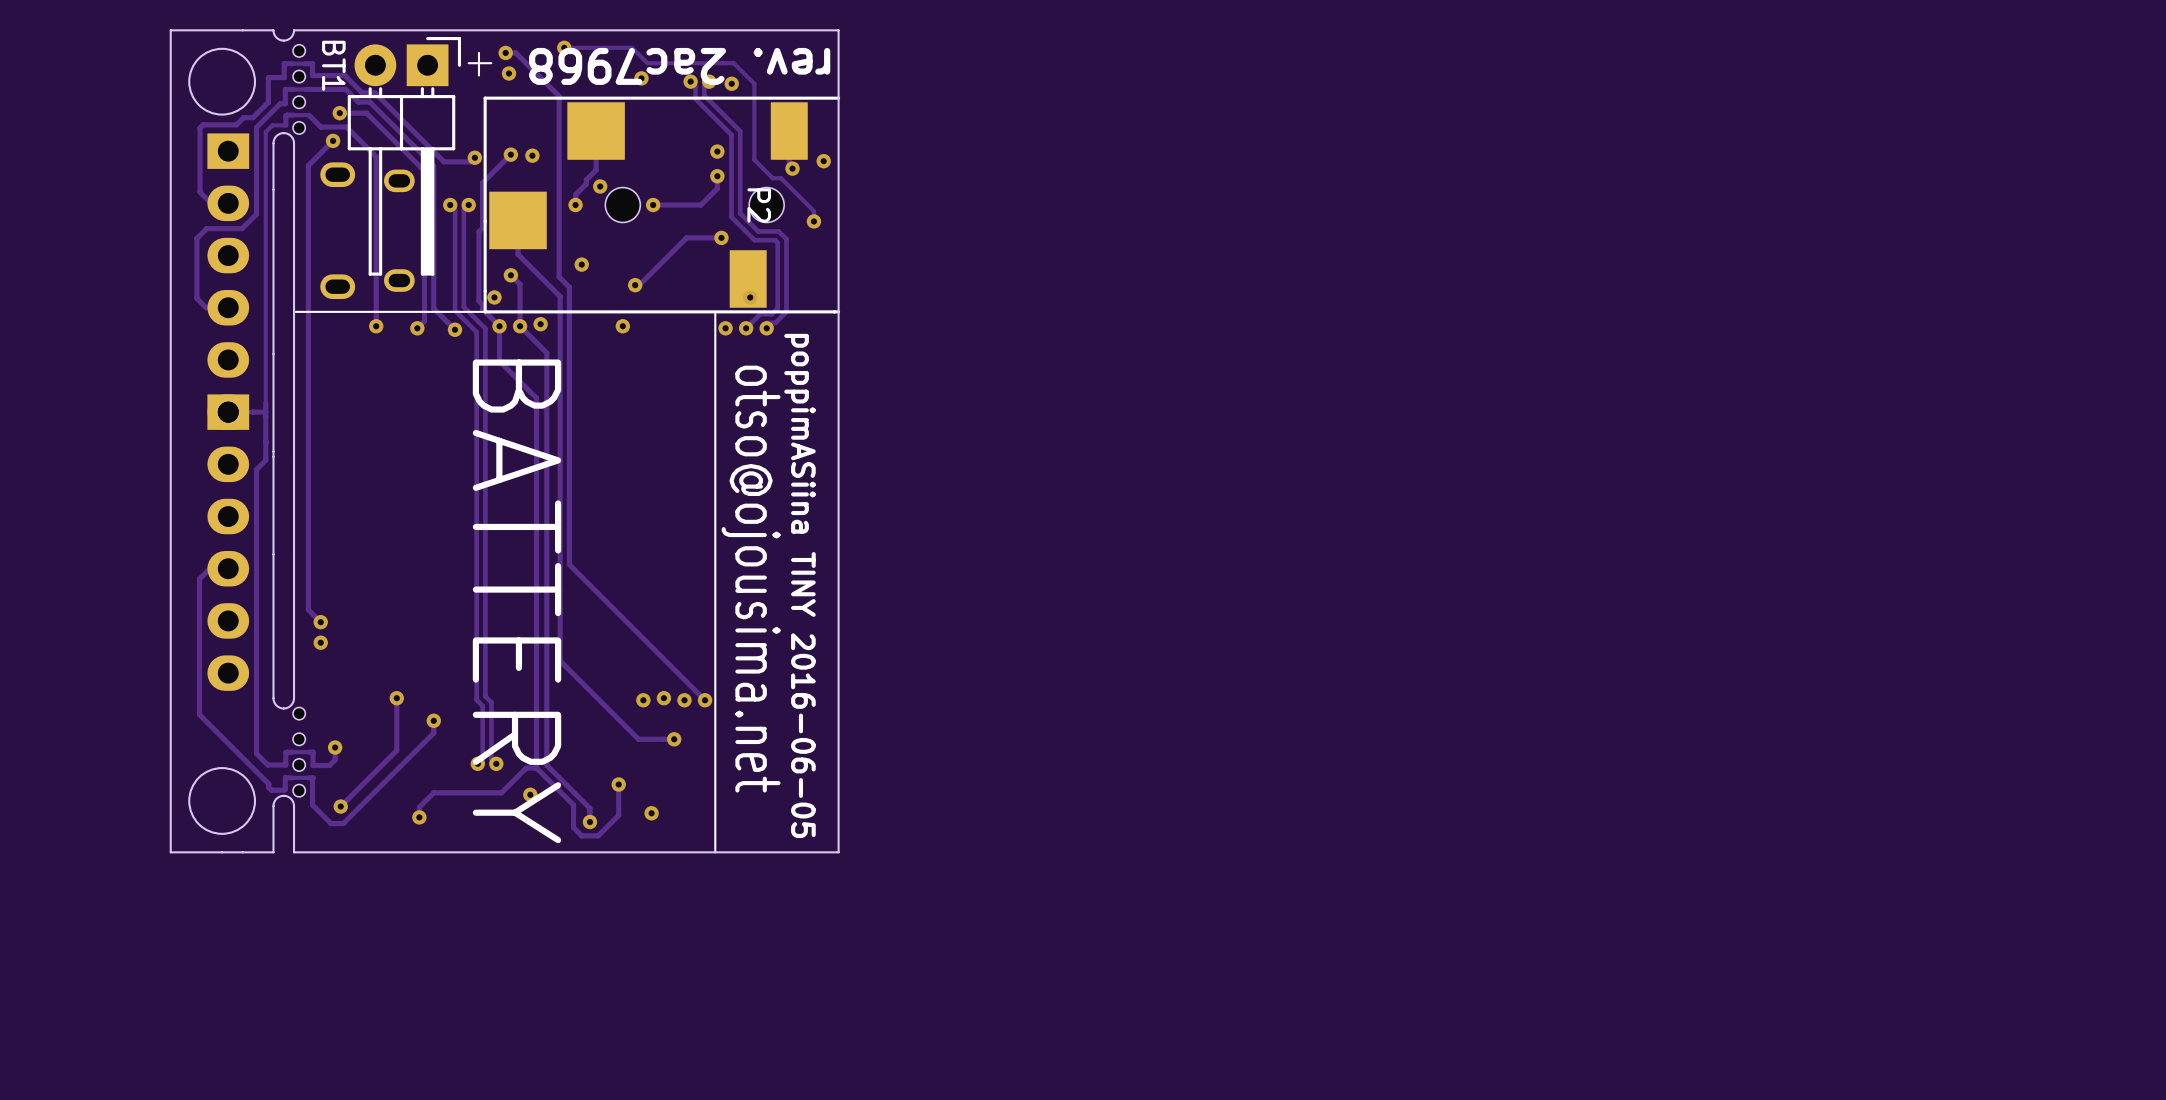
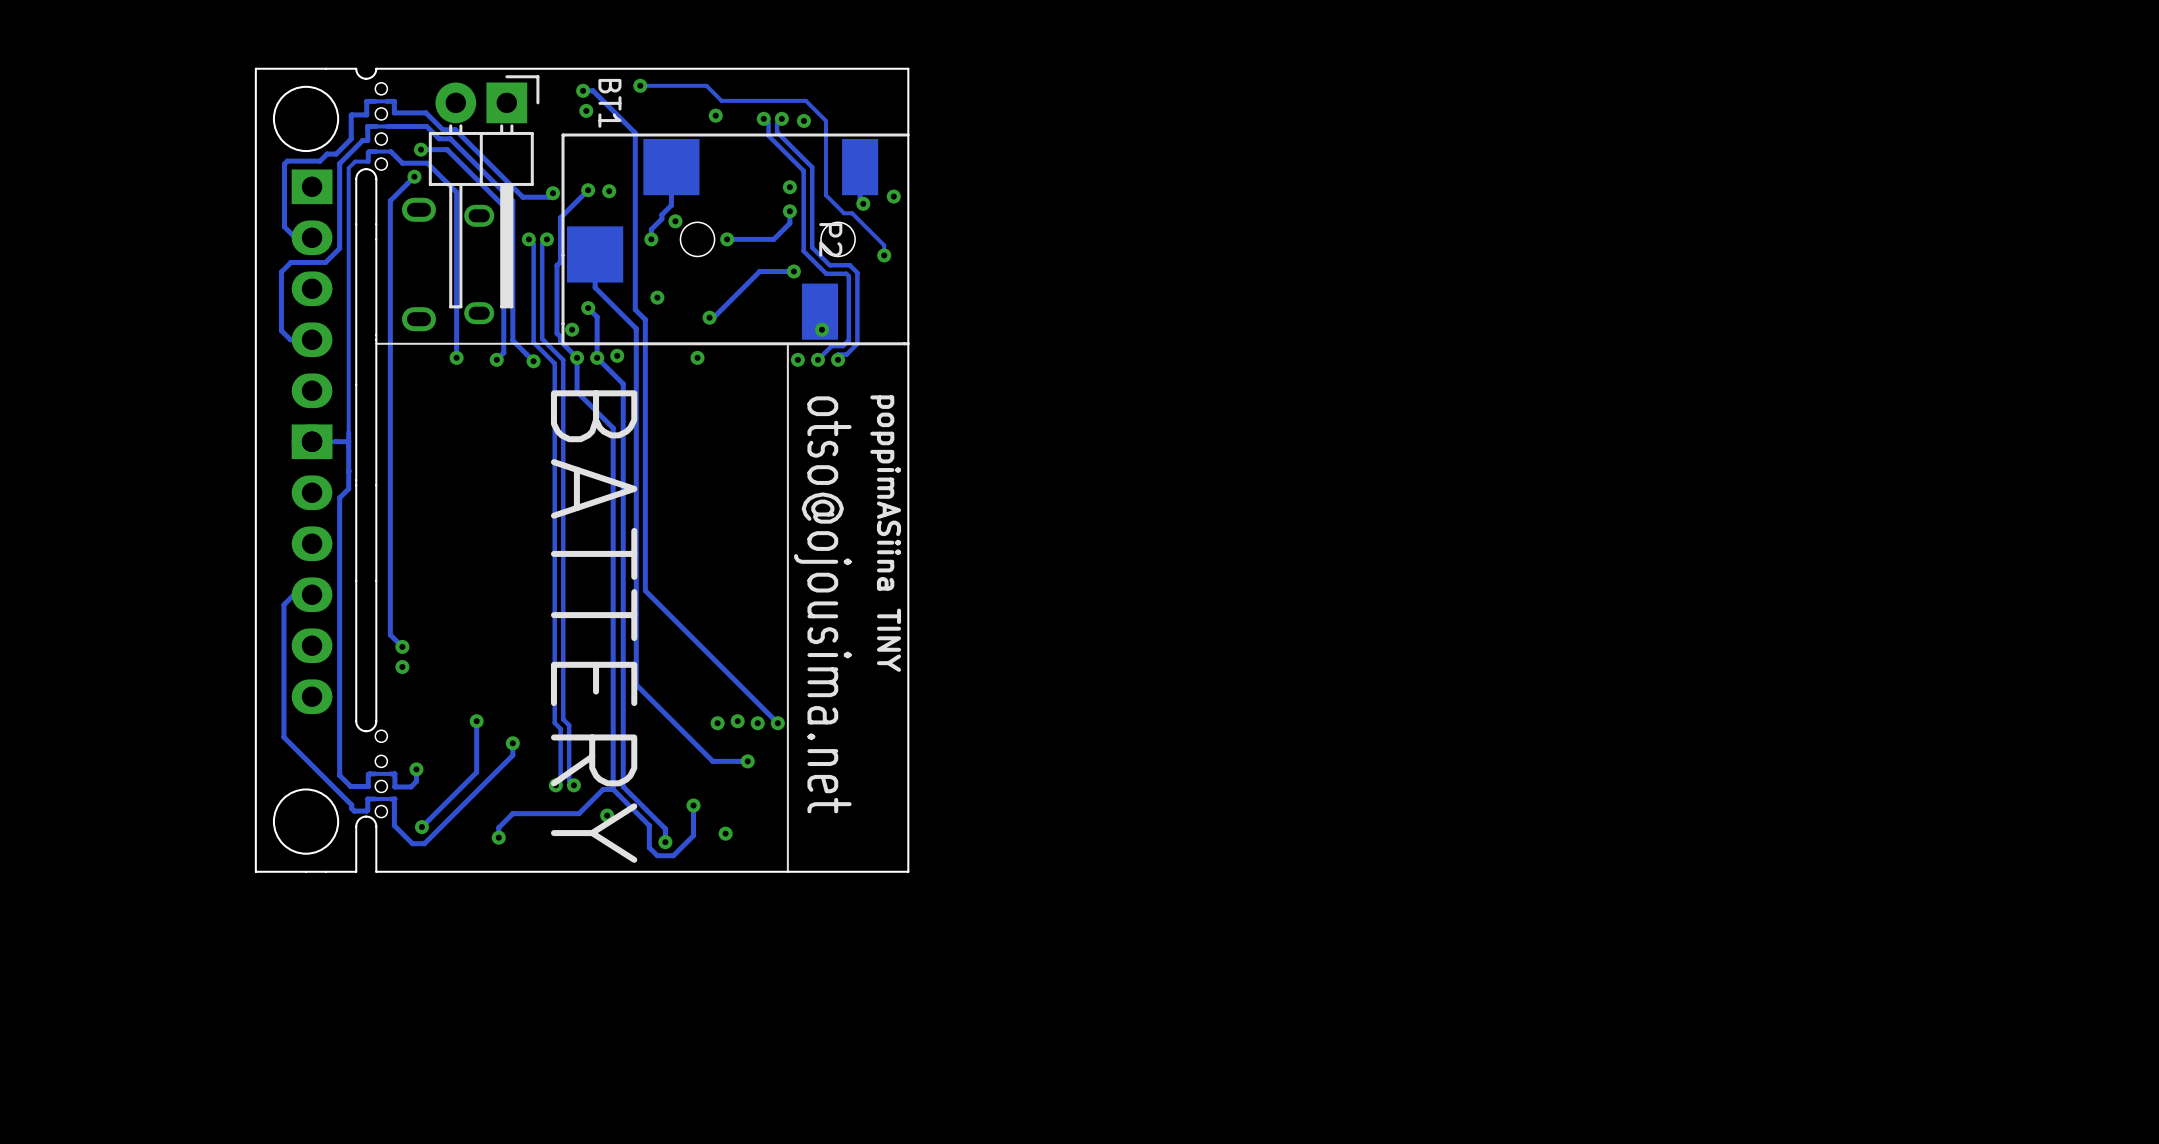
line: (478, 52) (478, 75) -> none
line: (491, 63) (468, 63) -> none
BT1 name position: BT1 (333, 65) -> BT1 (609, 103)
text: rev. 2ac7968 (679, 66) -> none
text: poppimASiina TINY 2016-06-05 (799, 585) -> poppimASiina TINY (885, 533)

